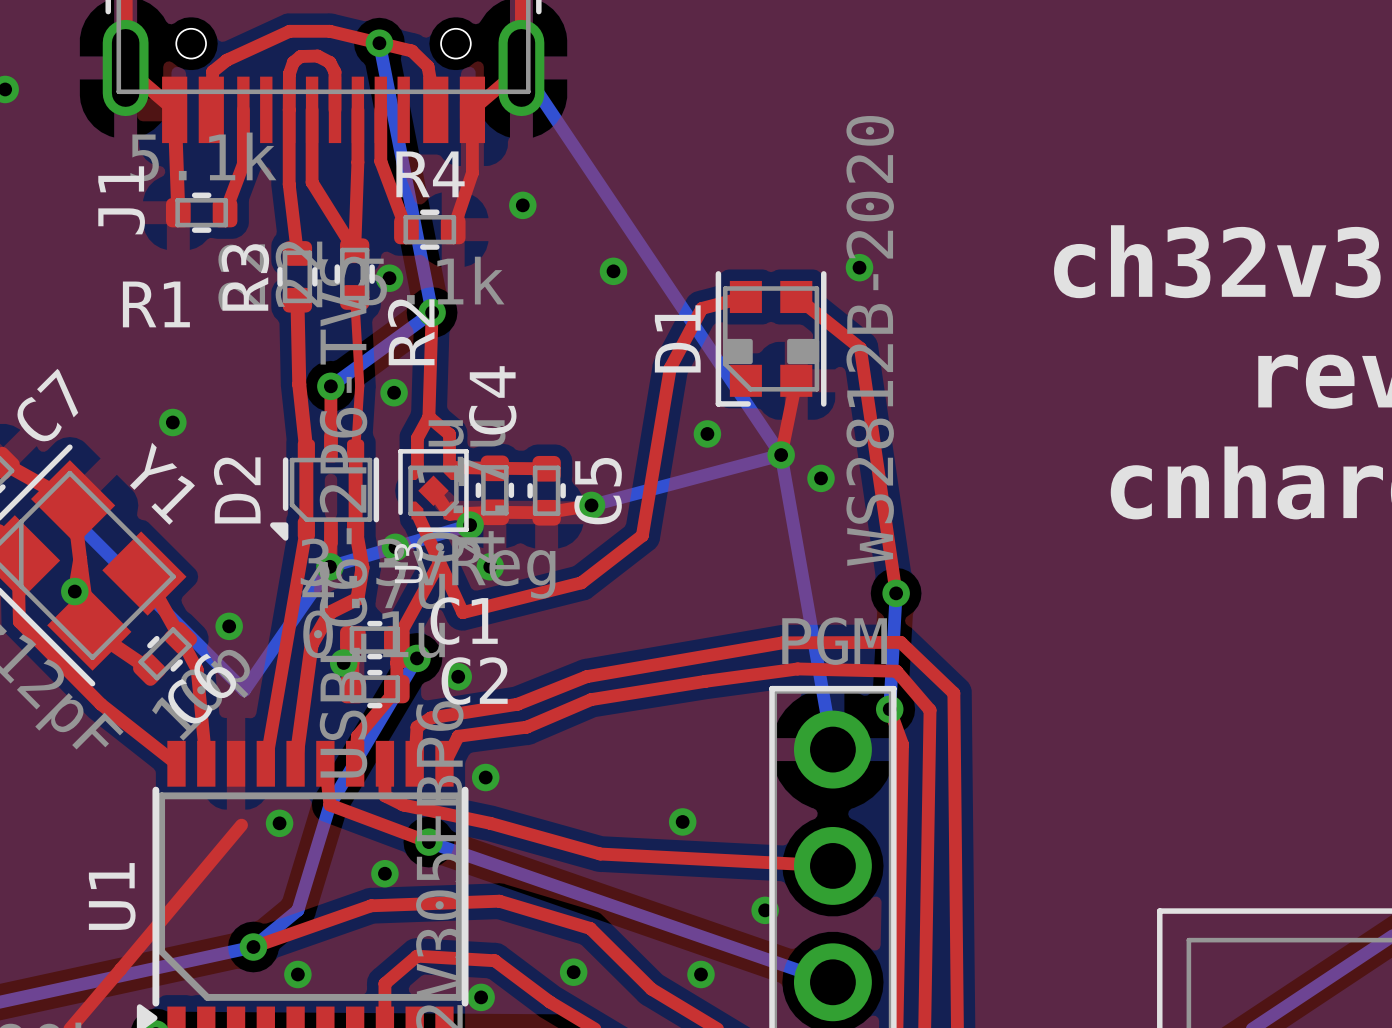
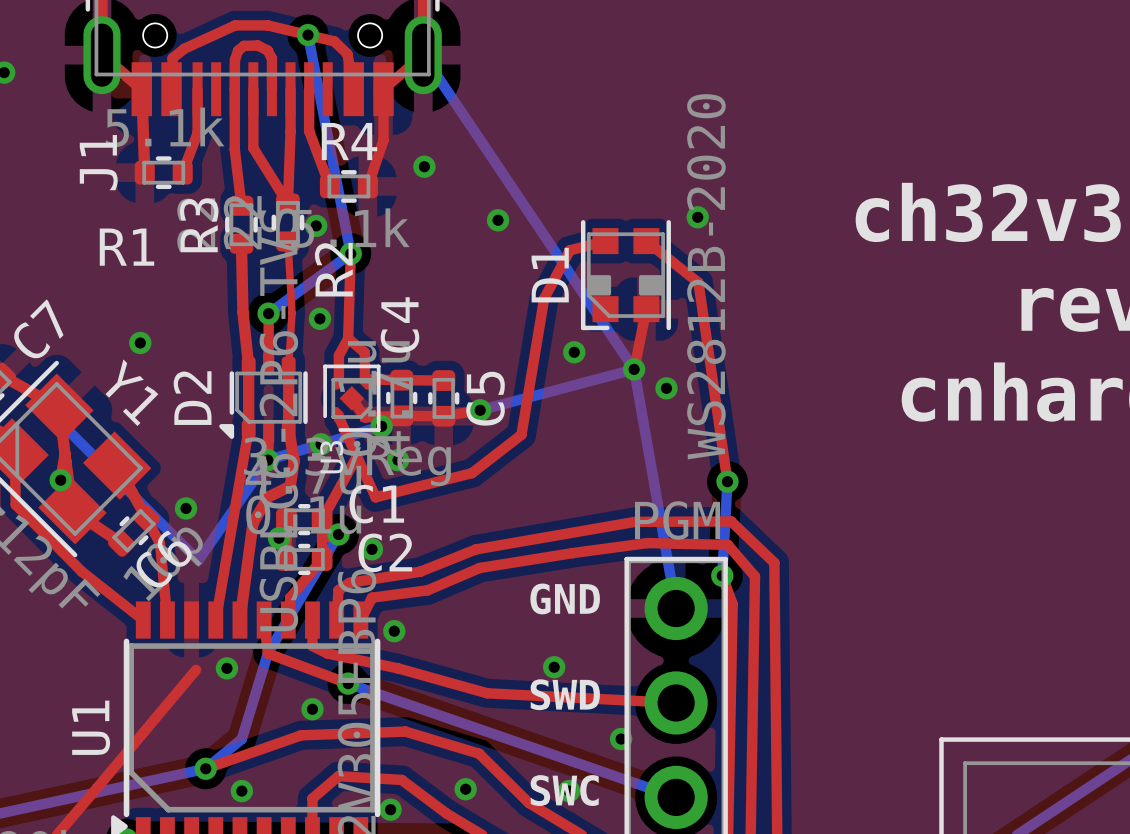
text: none -> GND (565, 598)
text: none -> SWD (565, 694)
text: none -> SWC (564, 790)

